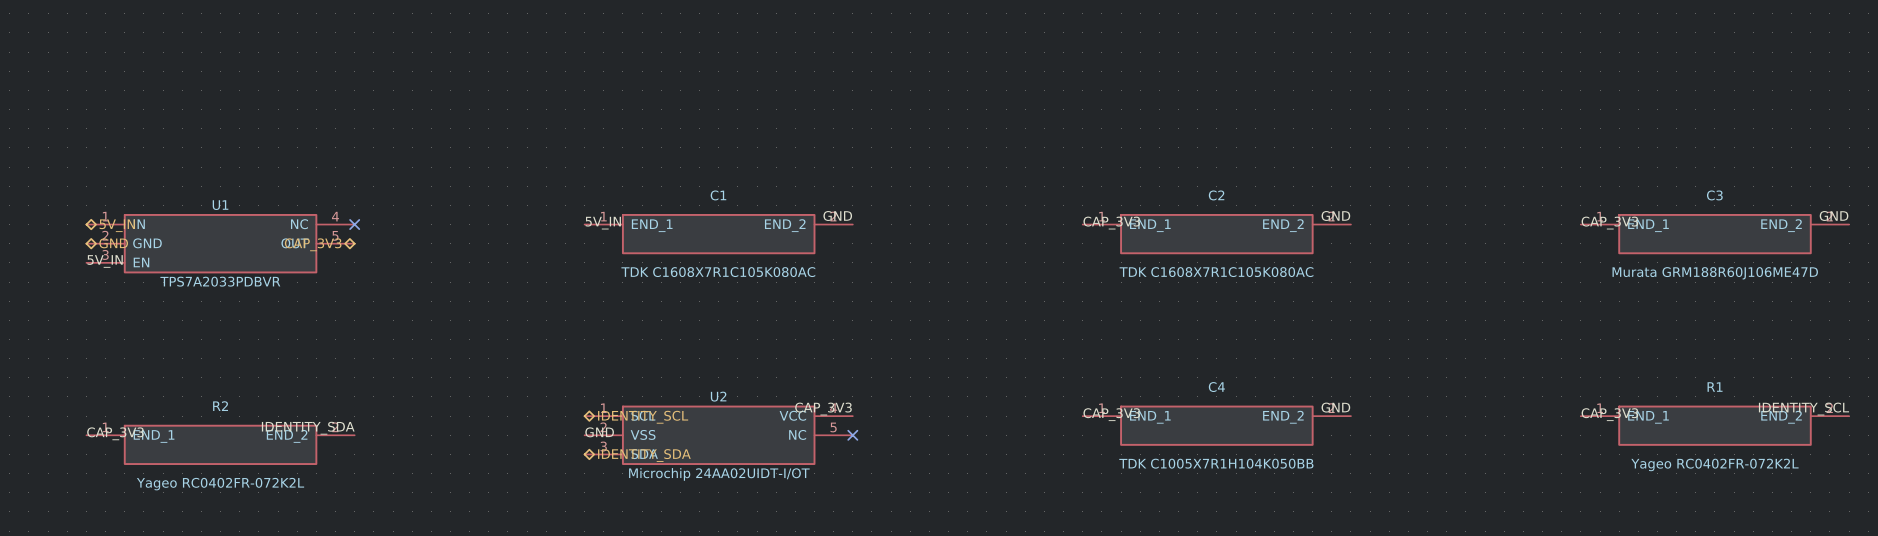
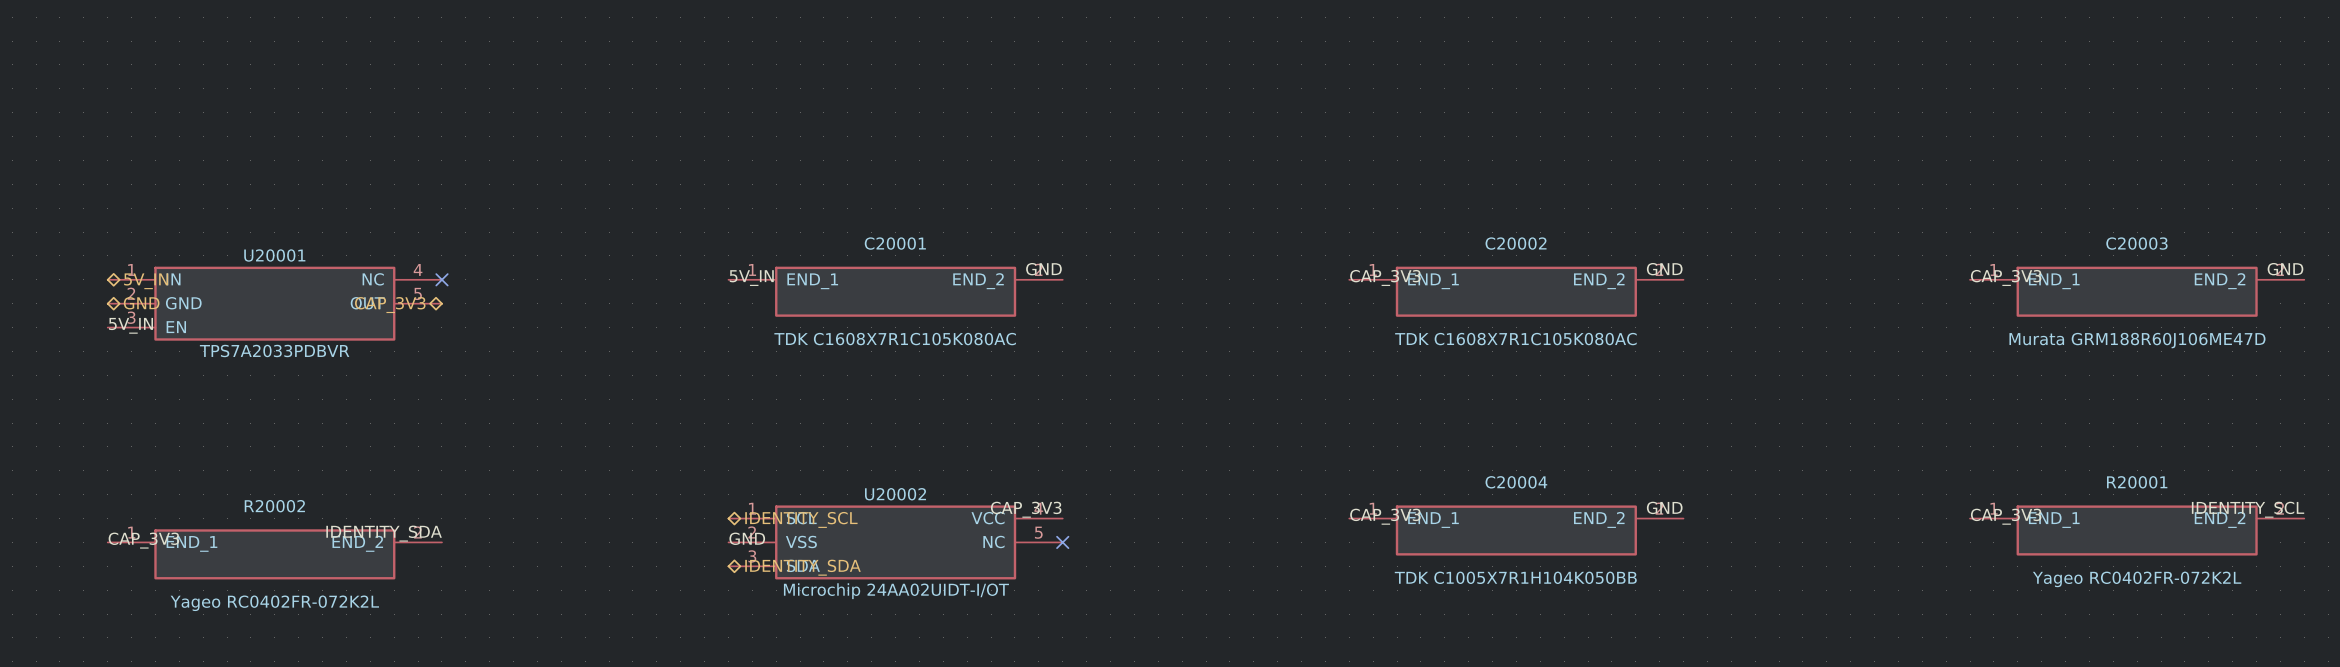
C1 name: C1 (718, 195) -> C20001 (895, 243)
C2 name: C2 (1216, 195) -> C20002 (1516, 243)
C3 name: C3 (1714, 195) -> C20003 (2136, 243)
U1 name: U1 (220, 205) -> U20001 (274, 255)
C4 name: C4 (1216, 387) -> C20004 (1516, 482)
R1 name: R1 (1715, 387) -> R20001 (2137, 482)
U2 name: U2 (718, 396) -> U20002 (895, 494)
R2 name: R2 (220, 406) -> R20002 (274, 506)

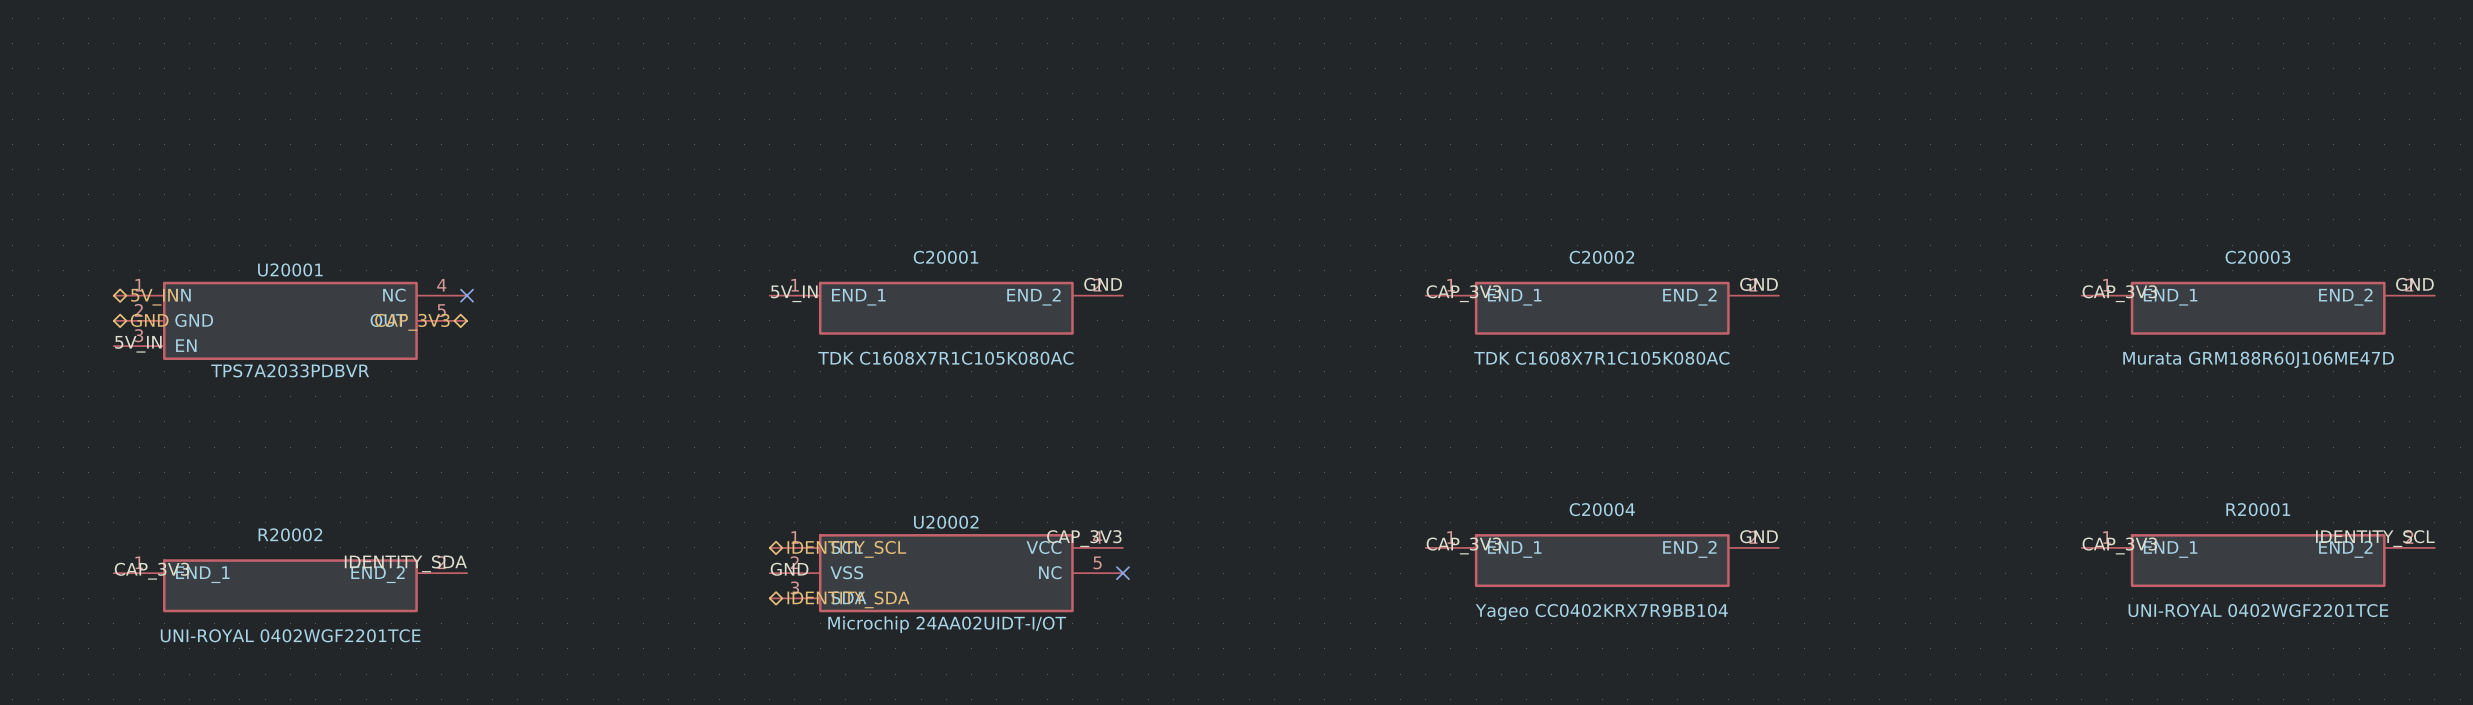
C20004 value: TDK C1005X7R1H104K050BB (1515, 577) -> Yageo CC0402KRX7R9BB104 (1601, 612)
R20001 value: Yageo RC0402FR-072K2L (2137, 579) -> UNI-ROYAL 0402WGF2201TCE (2258, 610)
R20002 value: Yageo RC0402FR-072K2L (274, 603) -> UNI-ROYAL 0402WGF2201TCE (290, 635)

